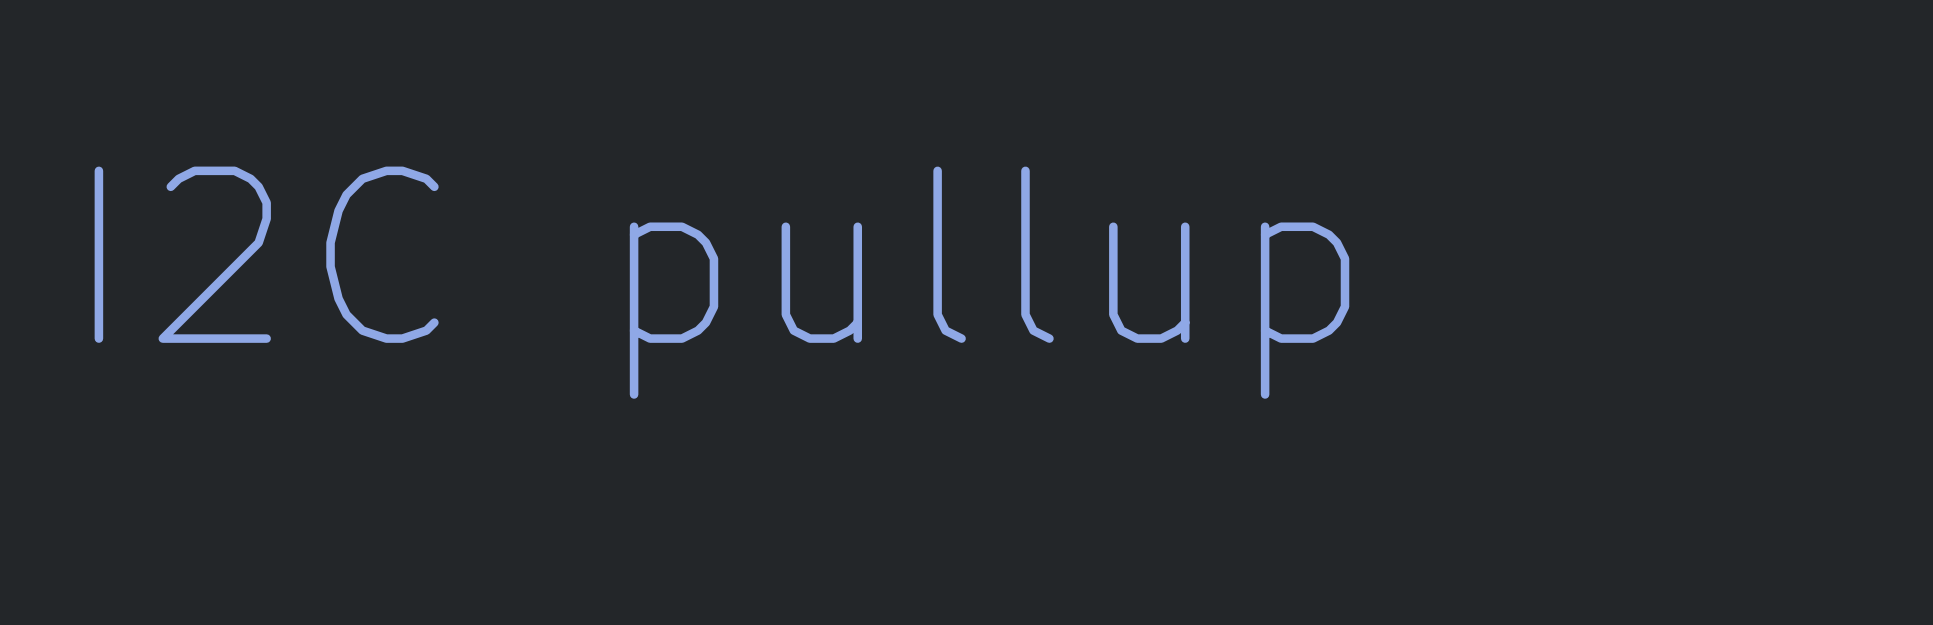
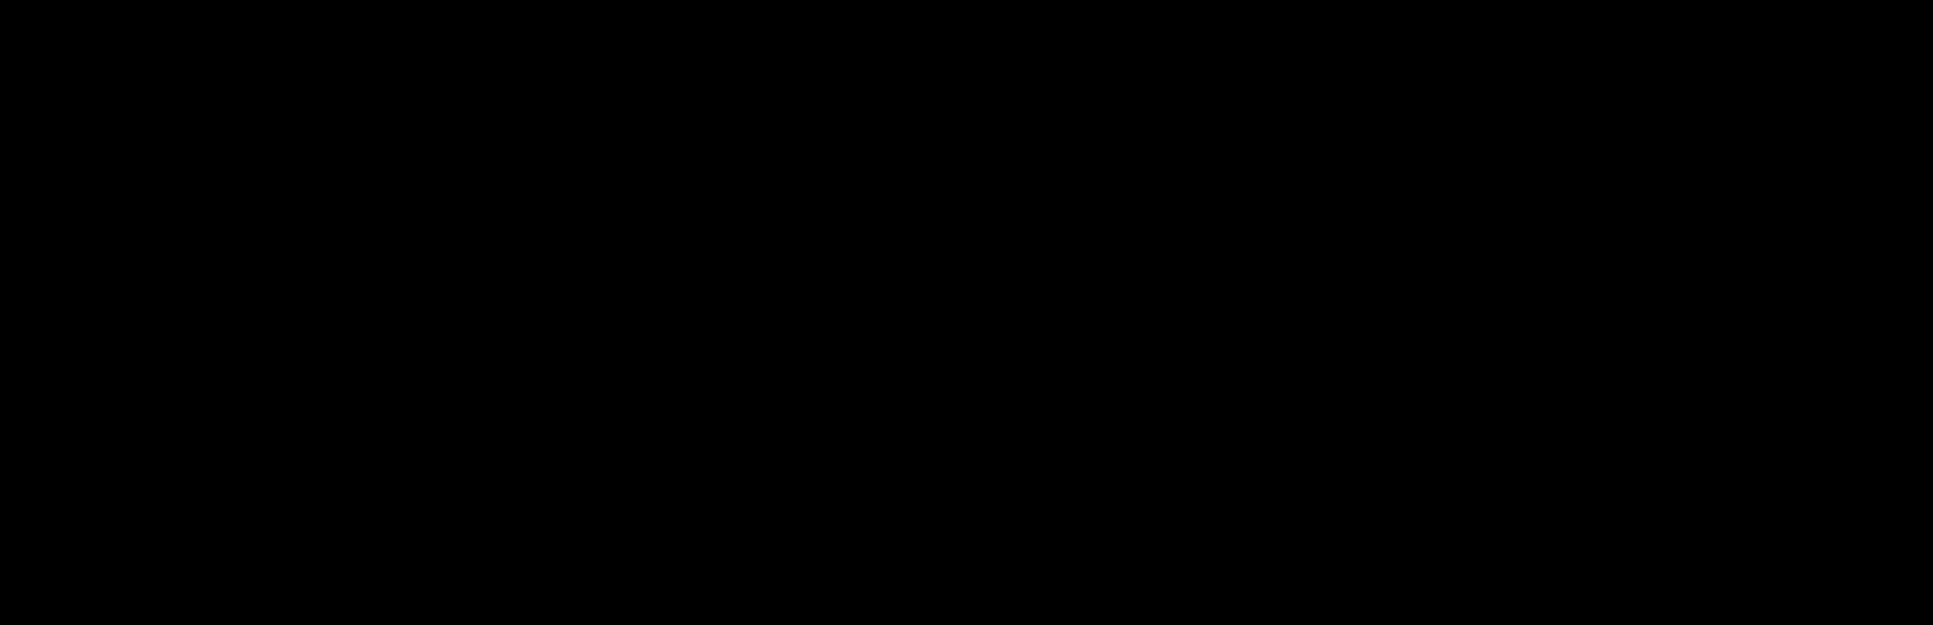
text: I2C pullup (721, 282) -> none

